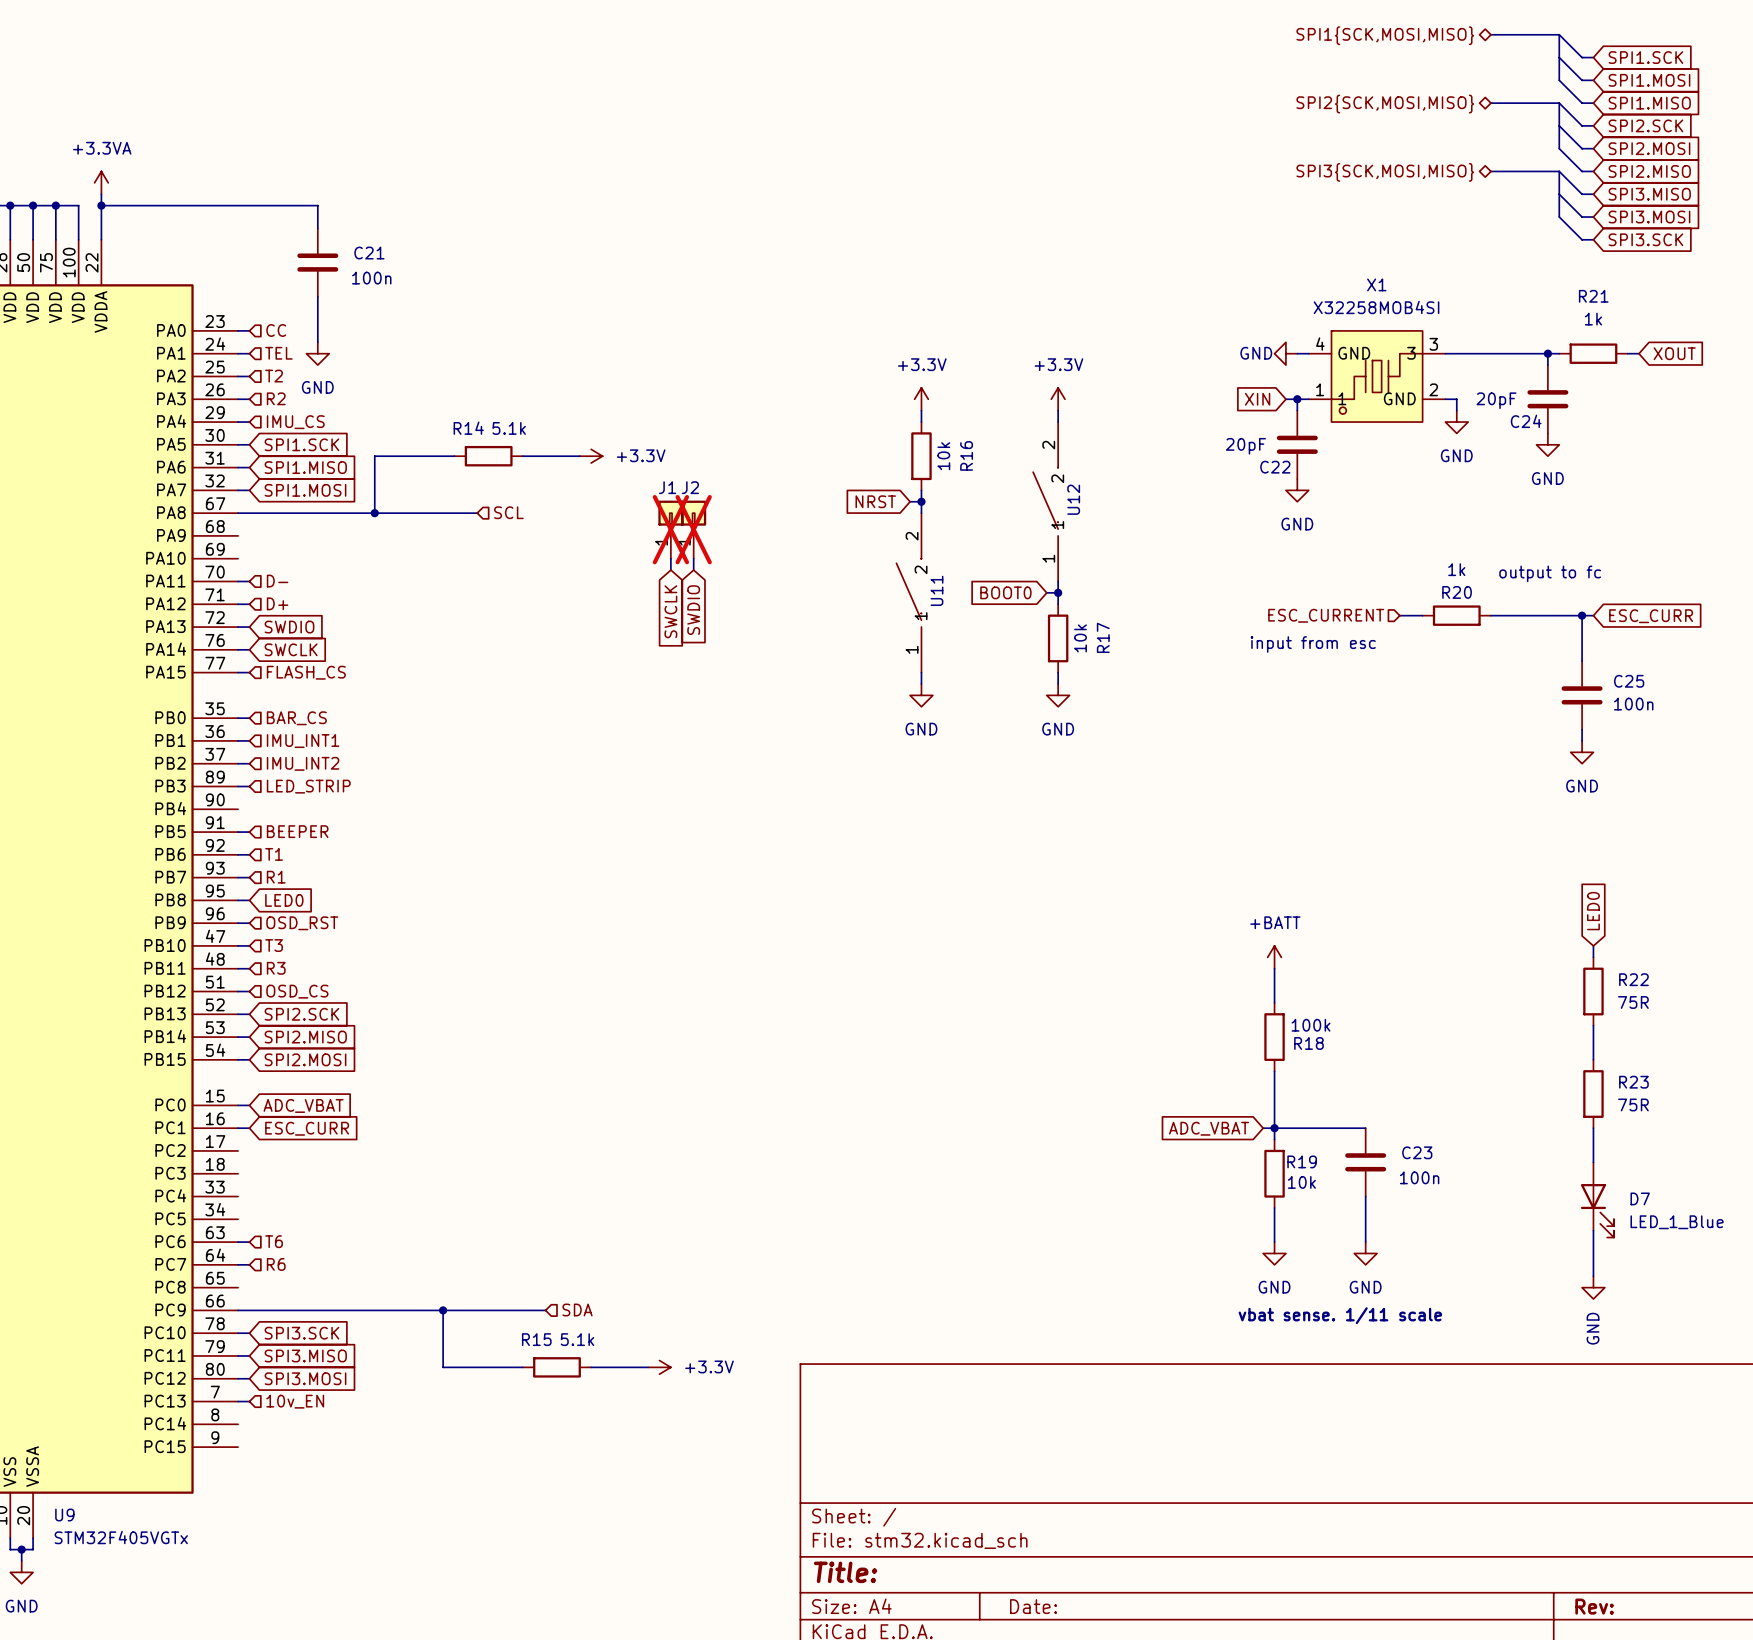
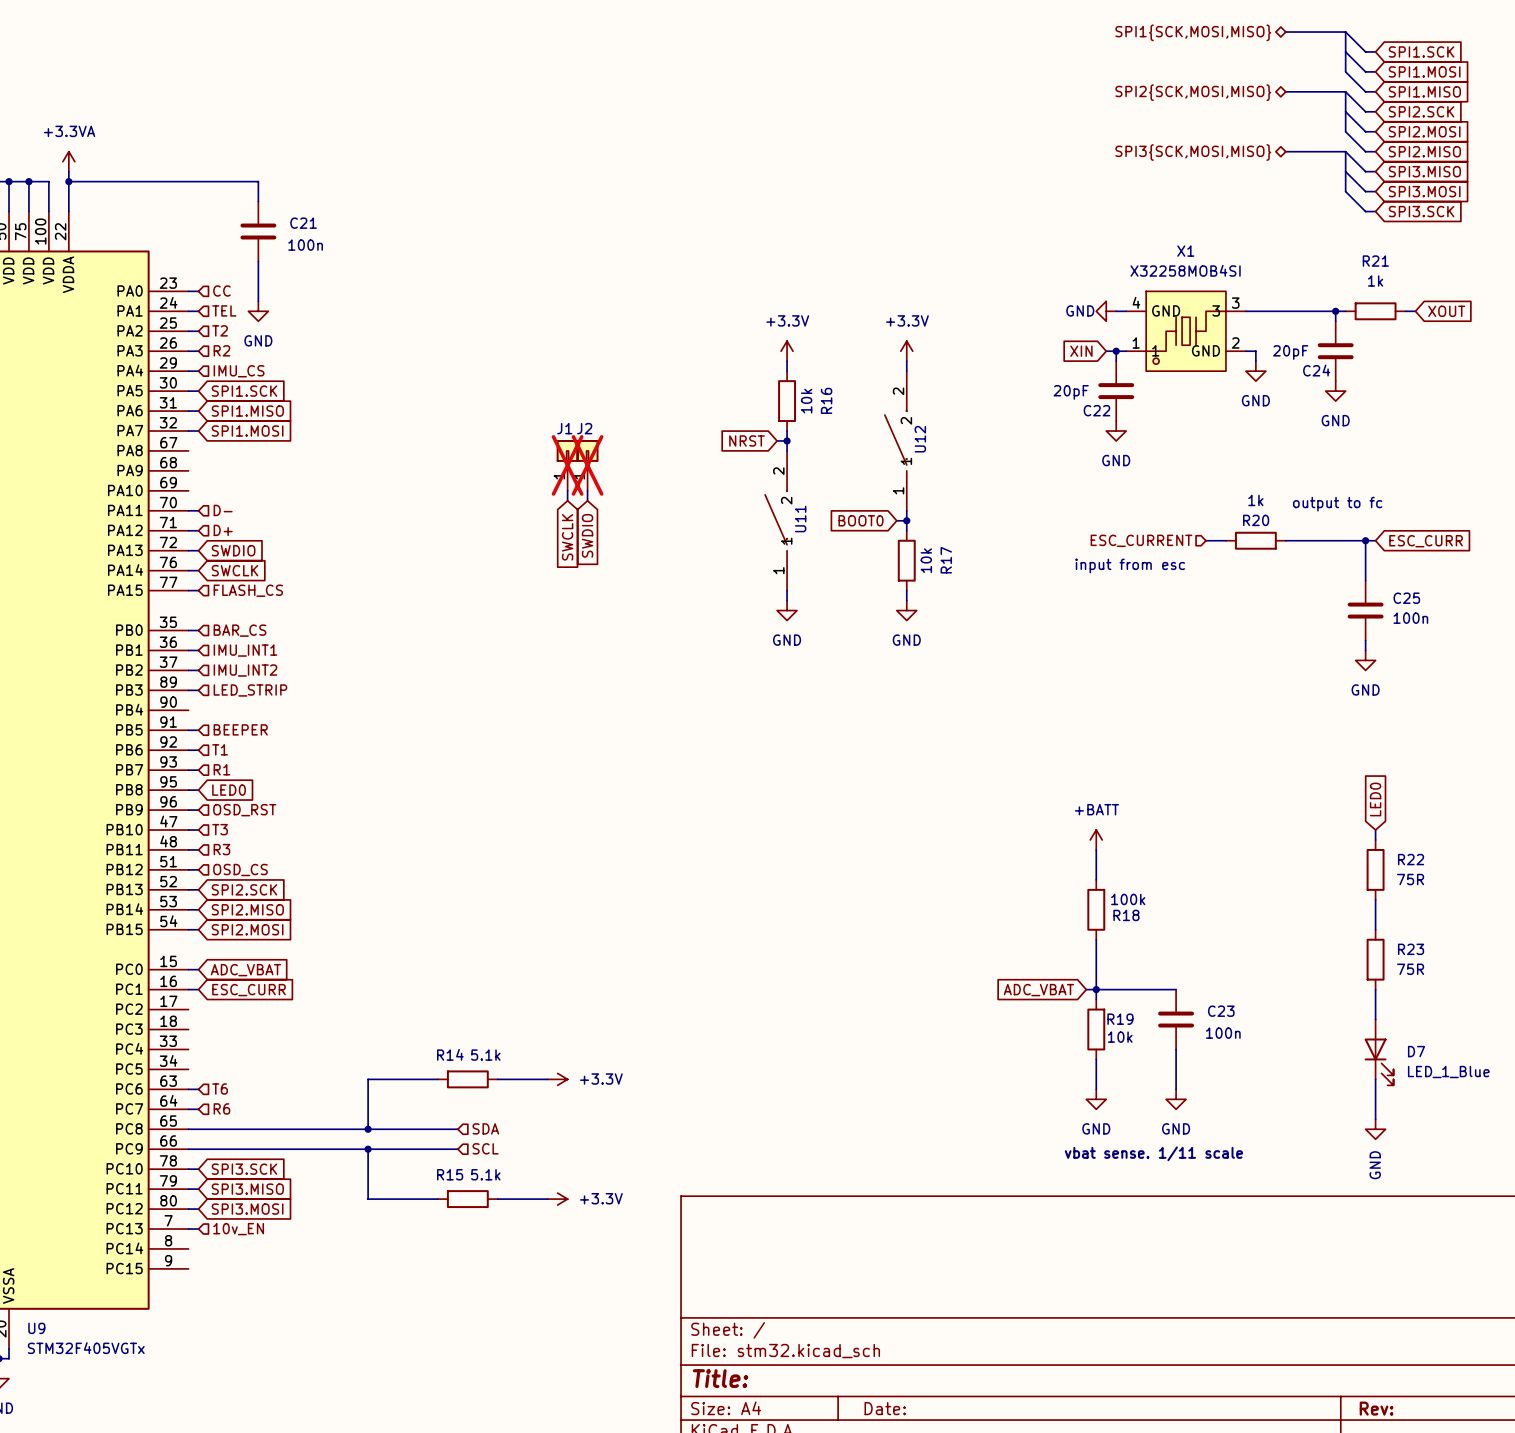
wire: (454, 456) (374, 456) (374, 513) -> none
R14 position: (488, 456) -> (467, 1079)
wire: (522, 456) (579, 456) -> none
power symbol: +3.3V (591, 456) -> none
hierarchical label: SCL (508, 512) -> none
wire: (238, 513) (477, 513) -> none
junction: (374, 513) -> none
wire: none -> (437, 1079) (368, 1079) (368, 1129)
wire: none -> (497, 1079) (547, 1079)
power symbol: none -> +3.3V (557, 1079)
wire: none -> (188, 1129) (457, 1129)
junction: none -> (368, 1129)
hierarchical label: none -> SDA (485, 1128)
hierarchical label: SDA (577, 1310) -> SCL (485, 1148)

